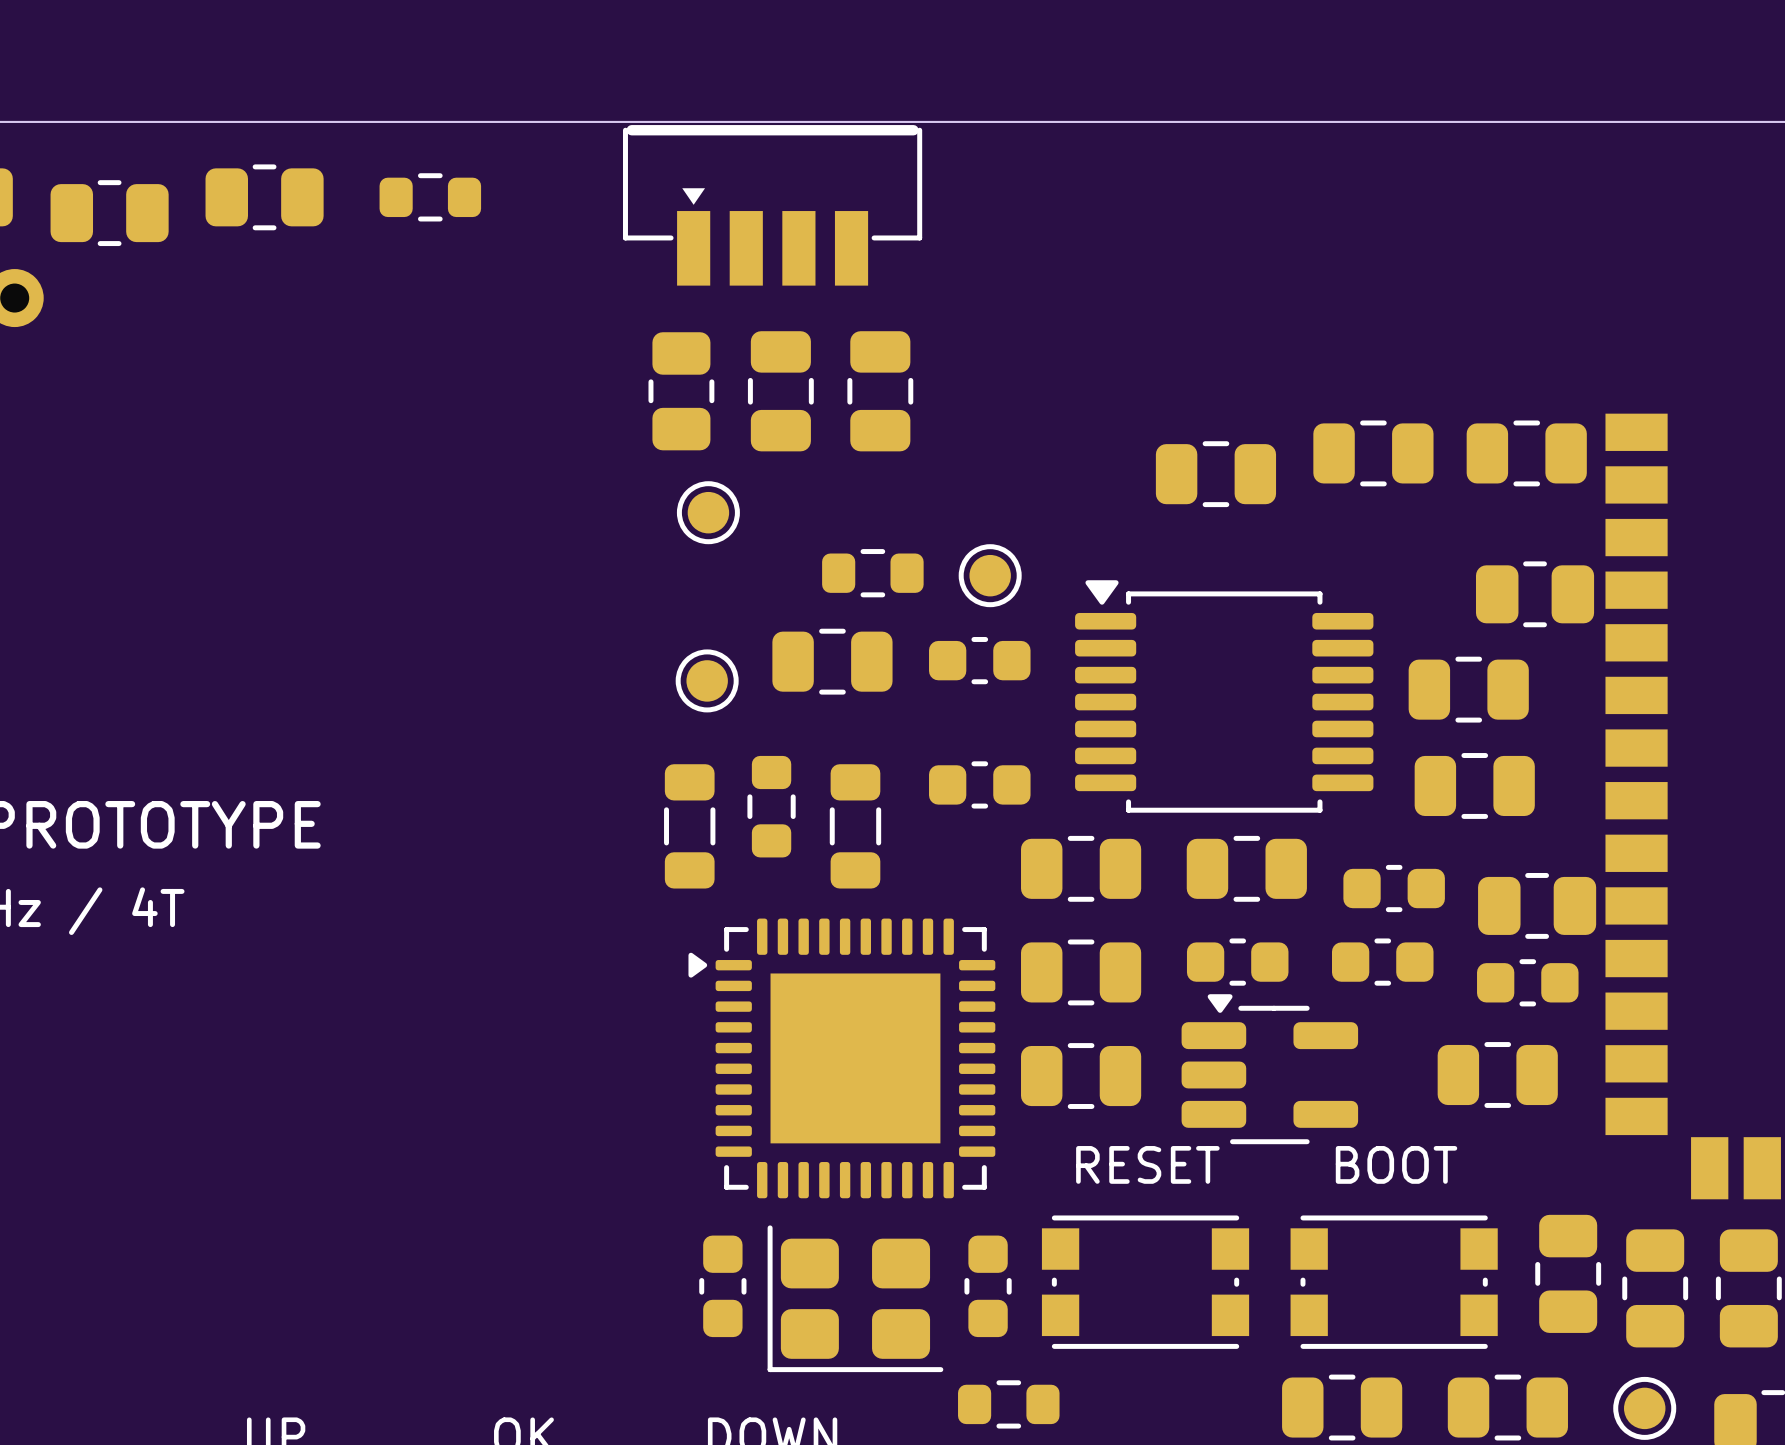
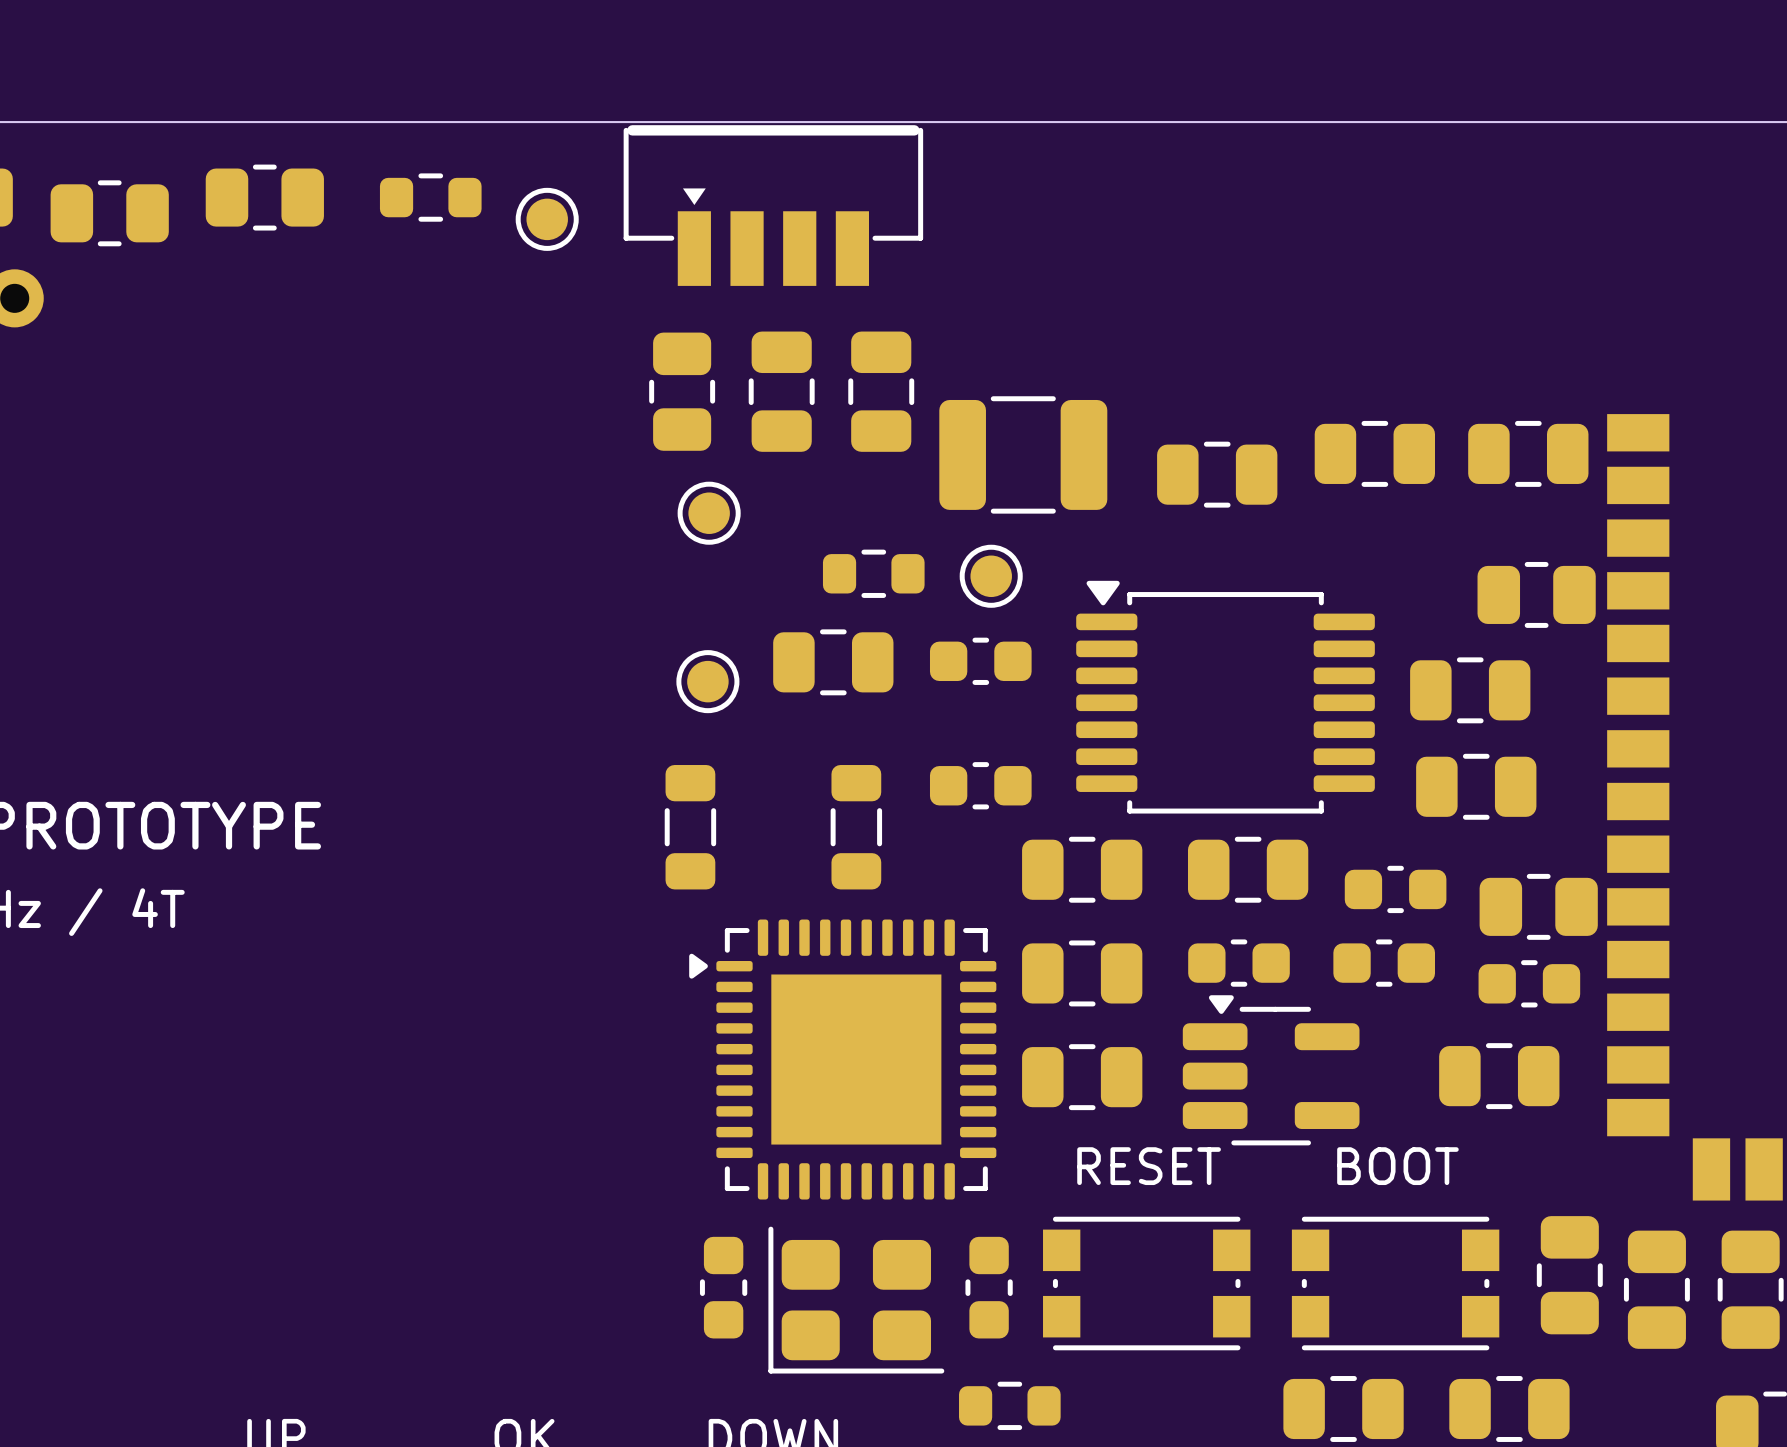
part: none -> (547, 219)
part: none -> (1023, 454)
part: (771, 806) -> none
part: (1644, 1408) -> none

